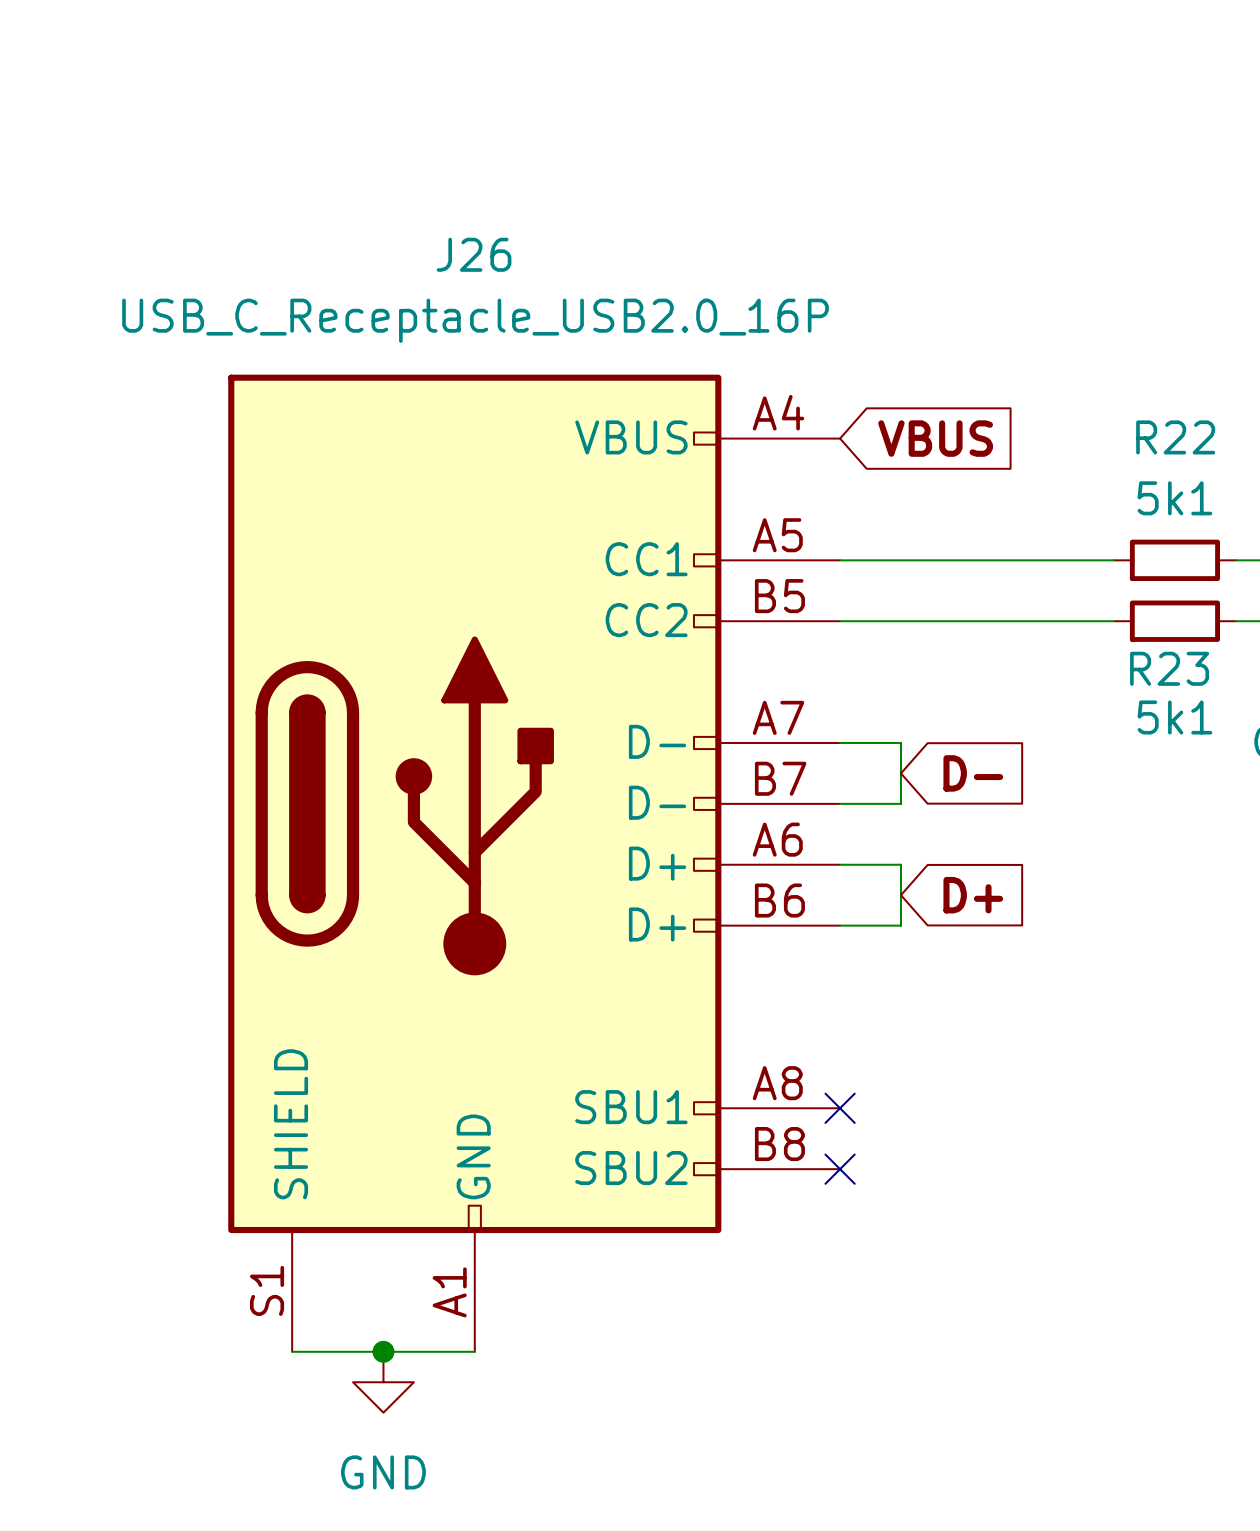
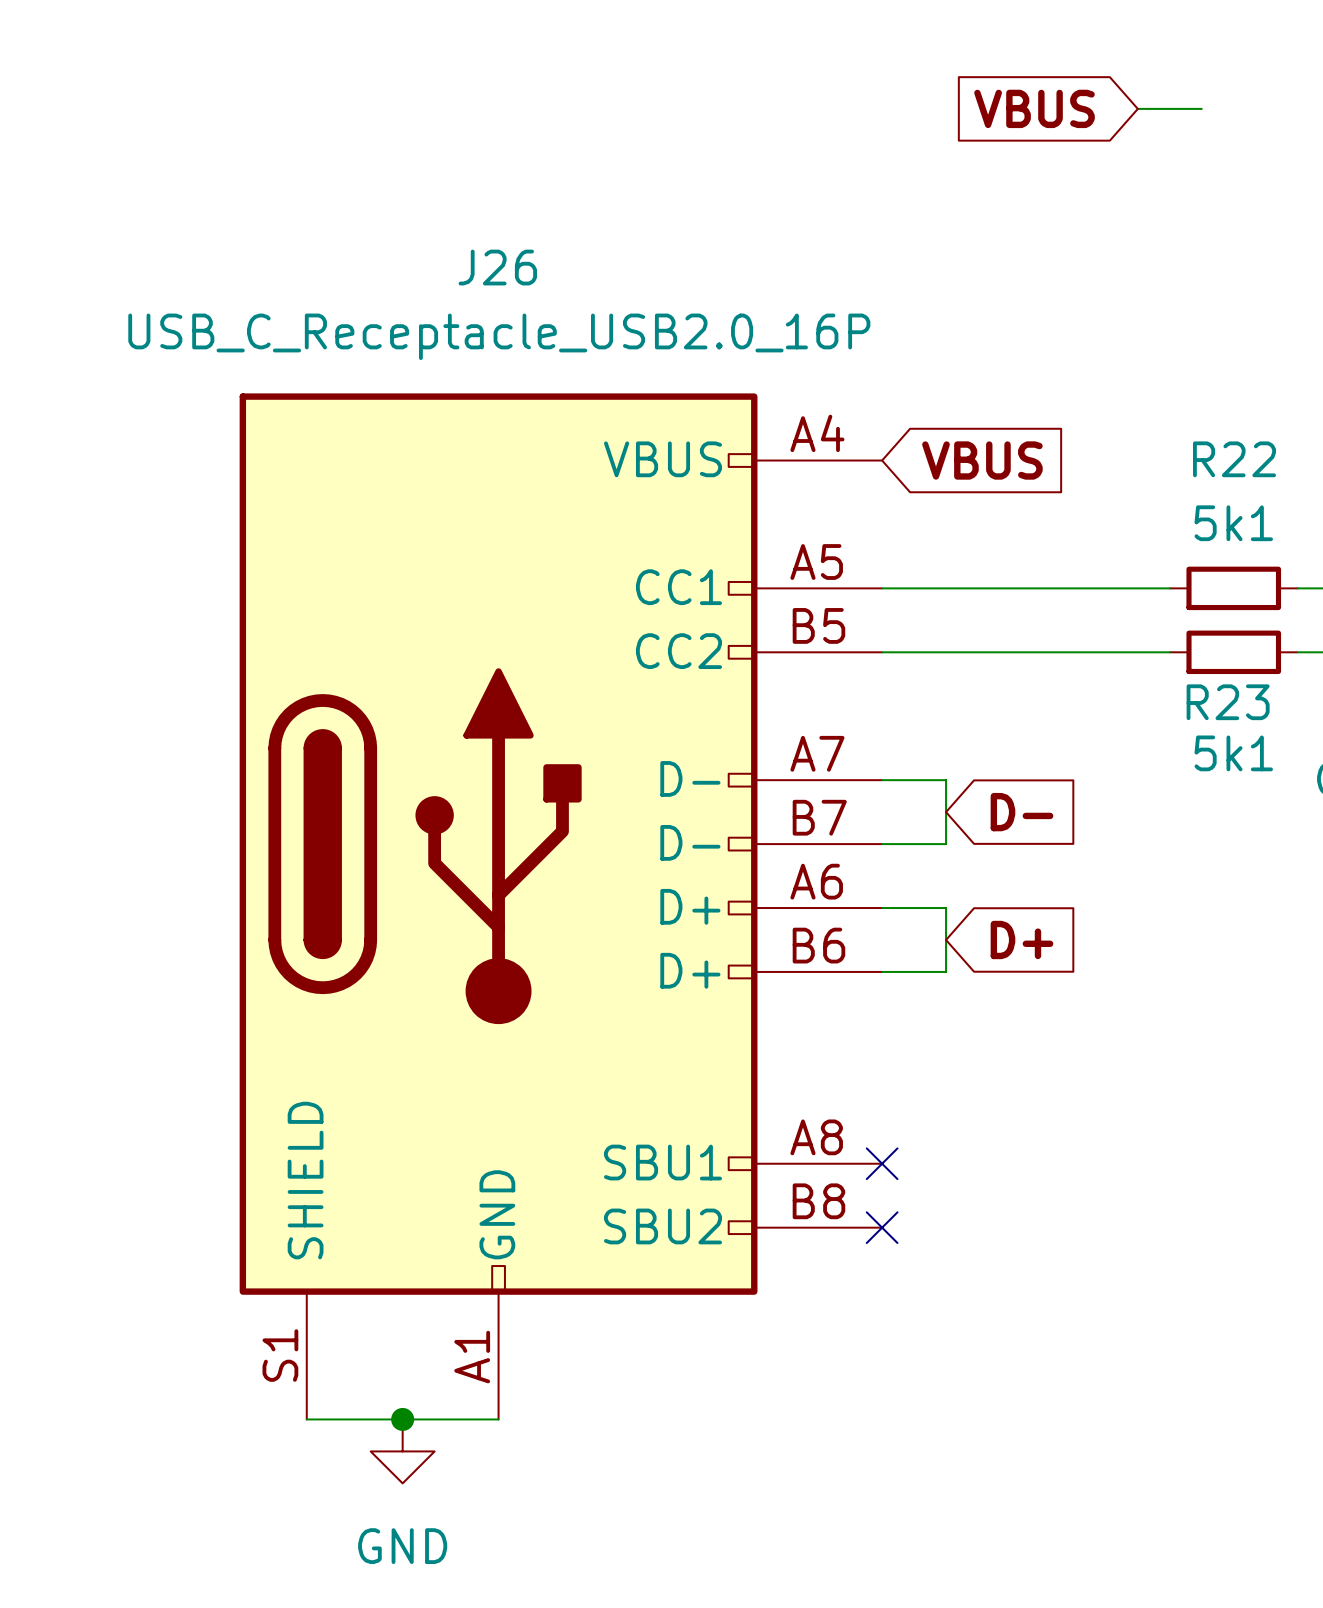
global label: none -> VBUS (1034, 108)
wire: none -> (1137, 108) (1201, 108)

